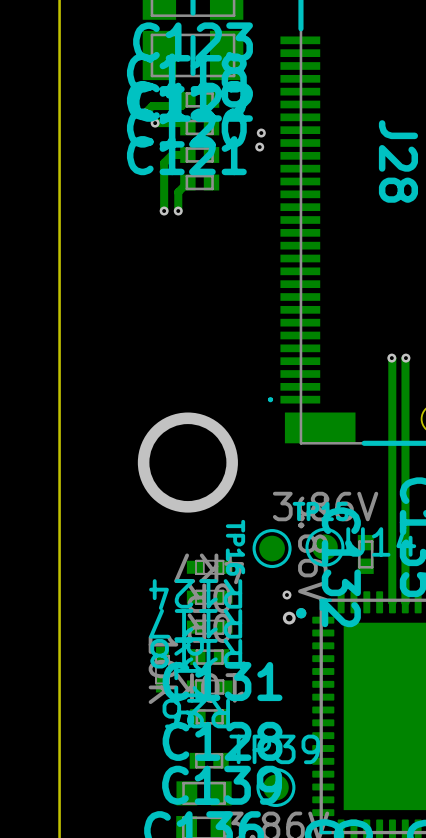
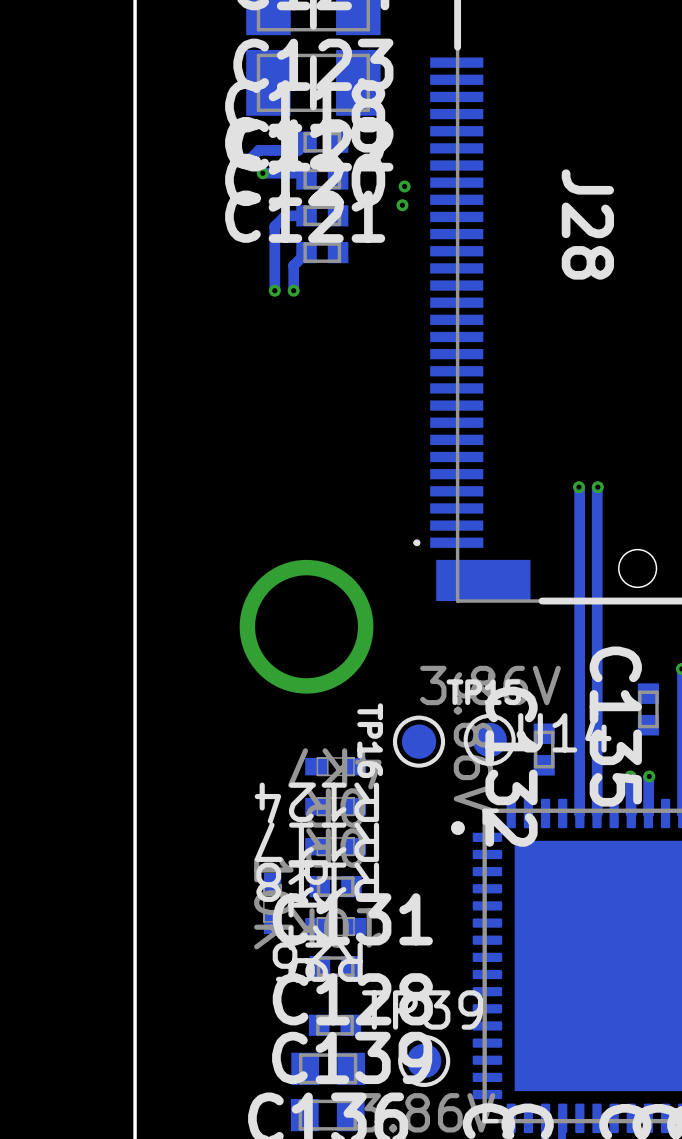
via: (286, 595) -> none
via: (289, 618) -> none

